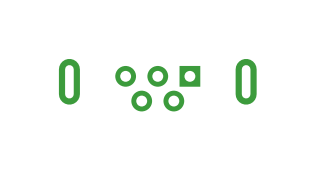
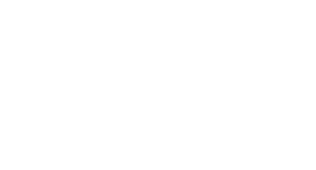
part: (157, 85) -> none

